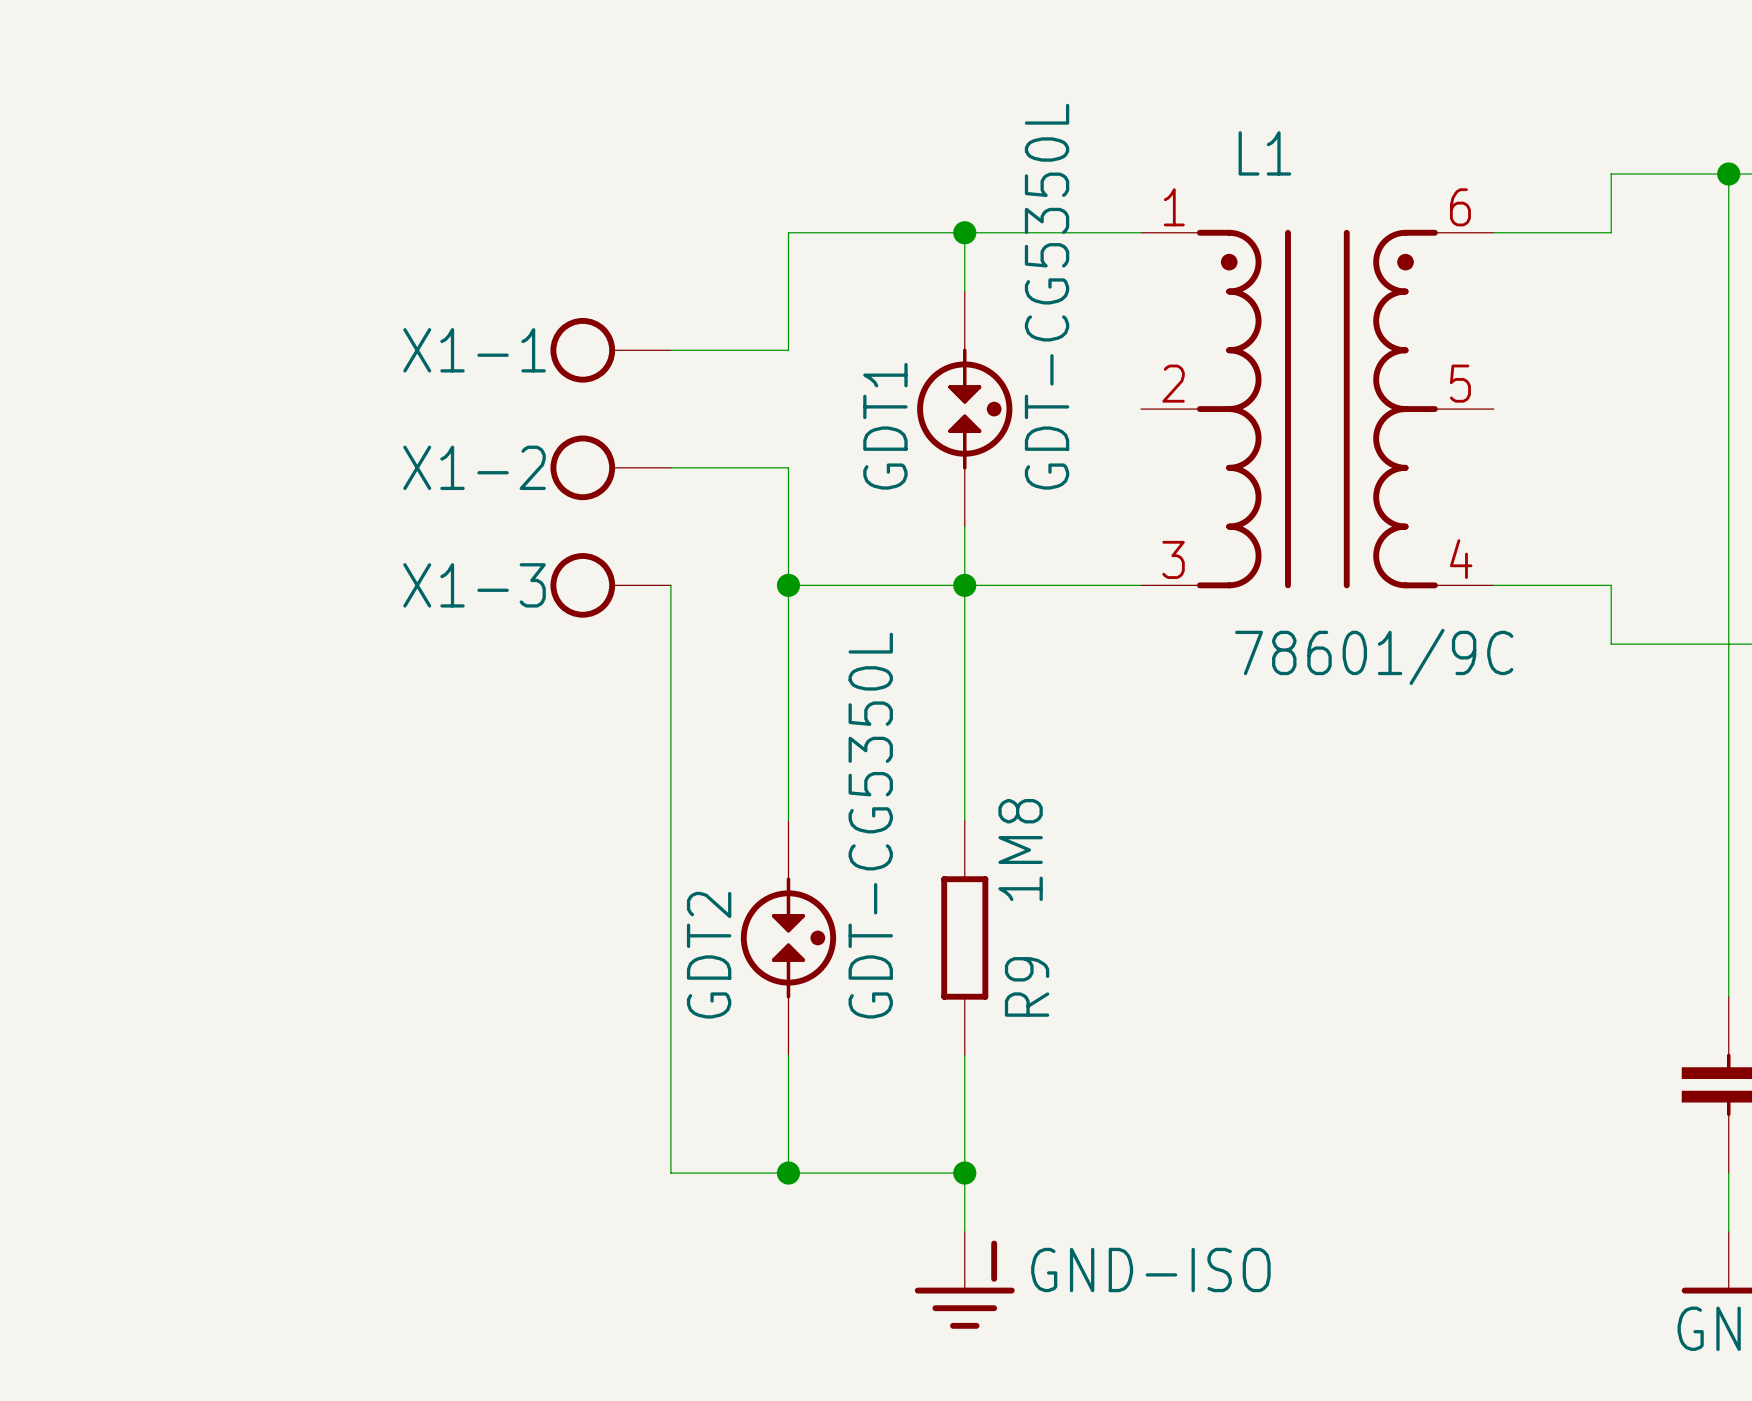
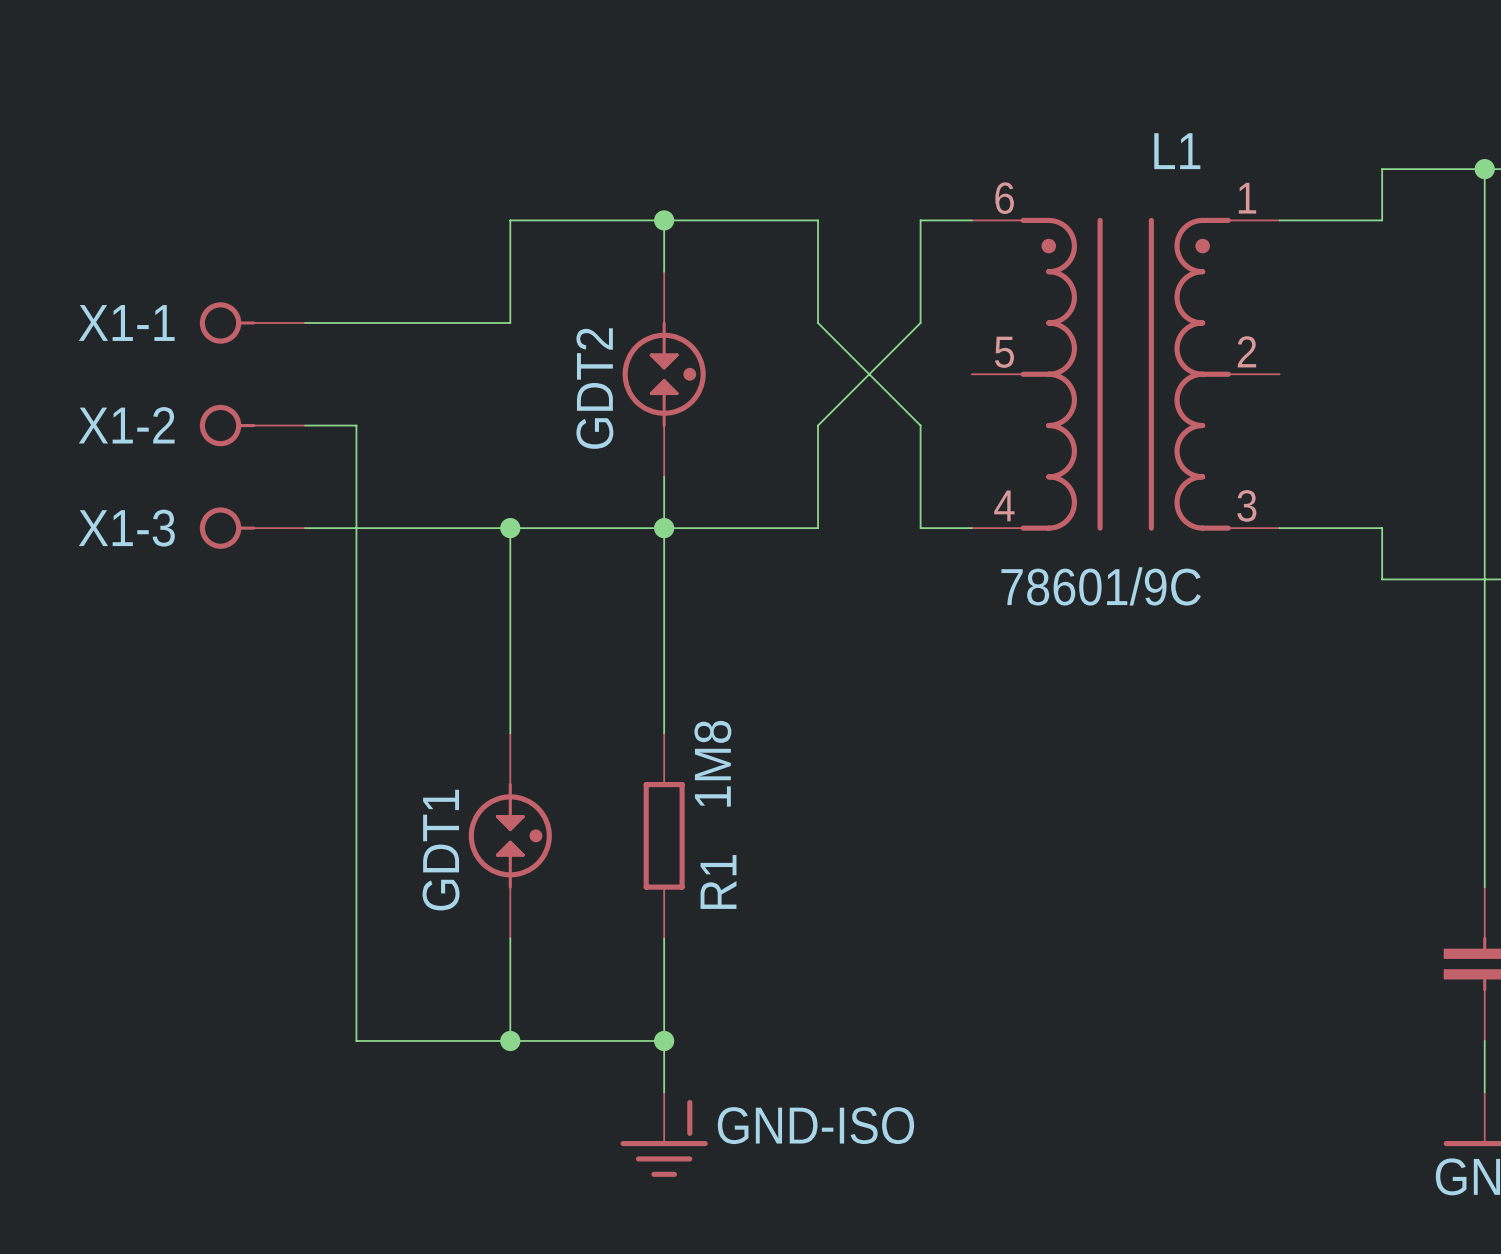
wire: none -> (664, 220) (510, 220) (510, 322) (305, 322)
junction: none -> (664, 220)
wire: (964, 232) (1082, 232) -> (818, 476) (818, 425) (920, 322) (920, 220)
junction: (964, 232) -> none
wire: (788, 291) (788, 350) (670, 350) -> none
GDT1 value: GDT-CG5350L (1047, 296) -> none
X1-1 symbol: [550, 317, 671, 383] -> [199, 302, 306, 344]
GDT1 position: (964, 409) -> (510, 835)
L1 flip: as is (1317, 409) -> left-right (1125, 374)
X1-2 symbol: [550, 435, 671, 501] -> [199, 404, 306, 447]
wire: (670, 467) (788, 467) (788, 526) -> none
X1-3 symbol: [550, 553, 671, 618] -> [199, 507, 306, 549]
wire: none -> (305, 528) (664, 528)
wire: none -> (510, 528) (510, 733)
junction: none -> (510, 528)
wire: (670, 585) (670, 1173) -> (305, 425) (356, 425) (356, 1040) (561, 1040)
junction: (964, 585) -> none
wire: (1082, 585) (964, 585) (964, 820) -> (920, 528) (920, 425) (818, 322) (818, 271)
GDT2 value: GDT-CG5350L (870, 825) -> none
GDT2 position: (788, 937) -> (664, 374)
R1: none -> 1M8 (664, 835)
R9: 1M8 (964, 937) -> none
wire: none -> (510, 938) (510, 1040)
wire: (964, 1055) (964, 1231) -> none
junction: none -> (510, 1040)
wire: (788, 1173) (964, 1173) -> (664, 1040) (664, 1092)
junction: (964, 1173) -> none
power symbol position: GND-ISO (964, 1280) -> GND-ISO (664, 1134)

